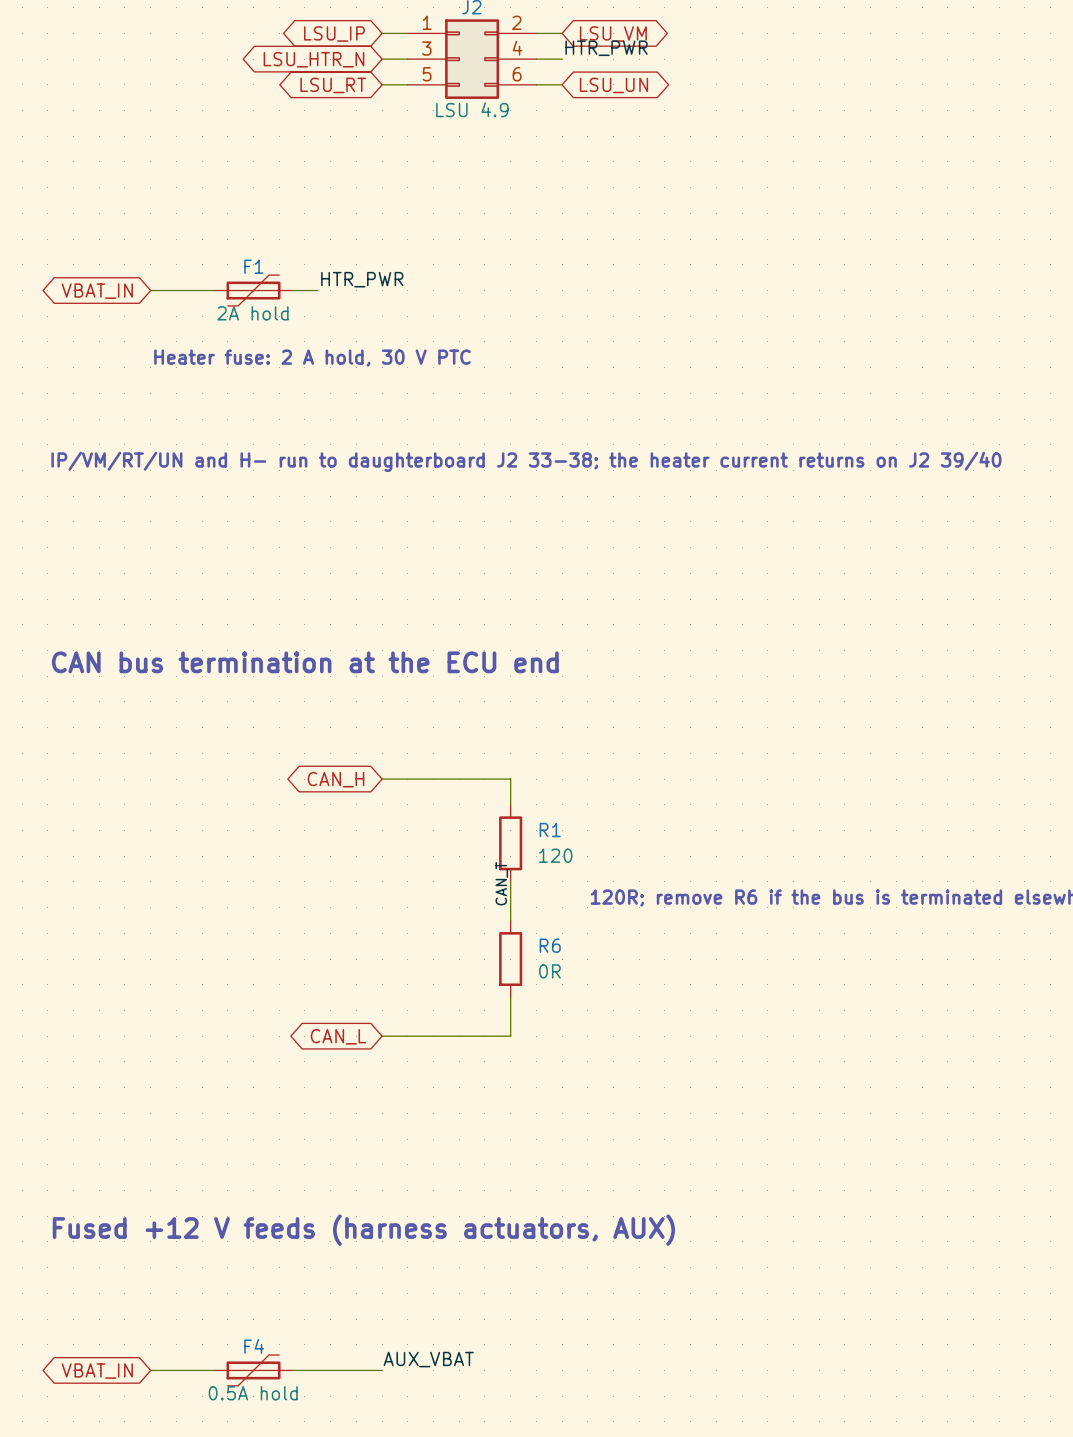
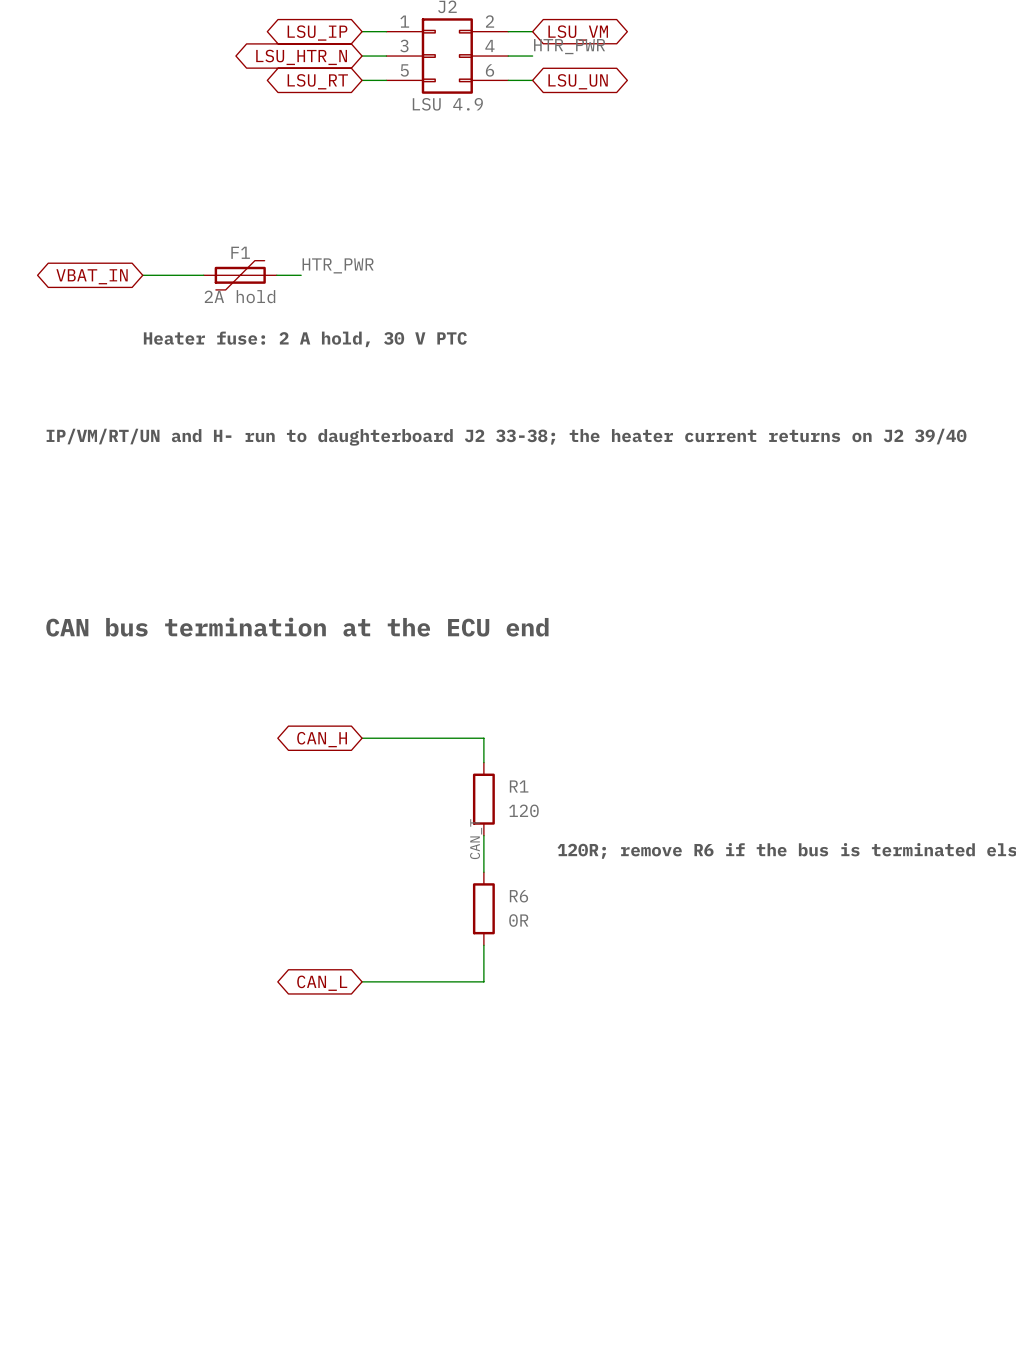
text: Fused +12 V feeds (harness actuators, AUX) (363, 1230) -> none
label: AUX_VBAT (428, 1359) -> none
wire: (150, 1370) (214, 1370) -> none
F4: 0.5A hold (253, 1370) -> none
wire: (292, 1370) (382, 1370) -> none
global label: VBAT_IN (97, 1371) -> none

